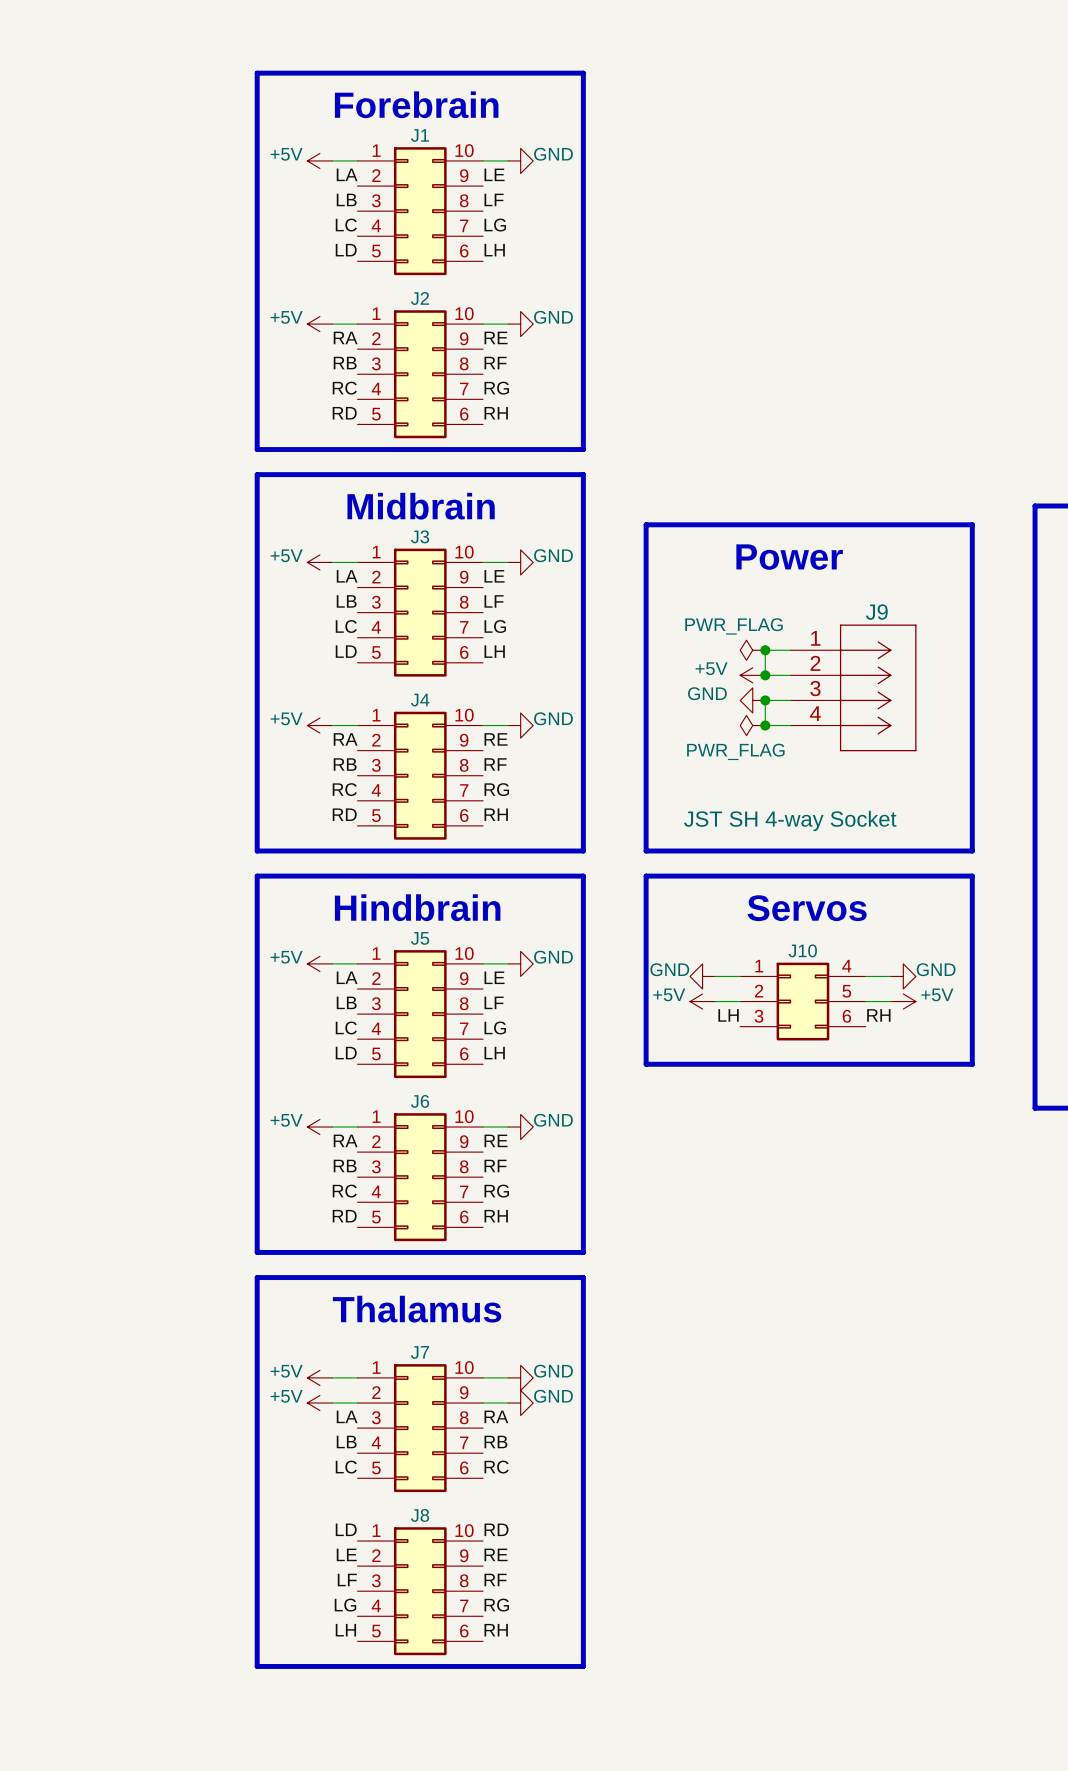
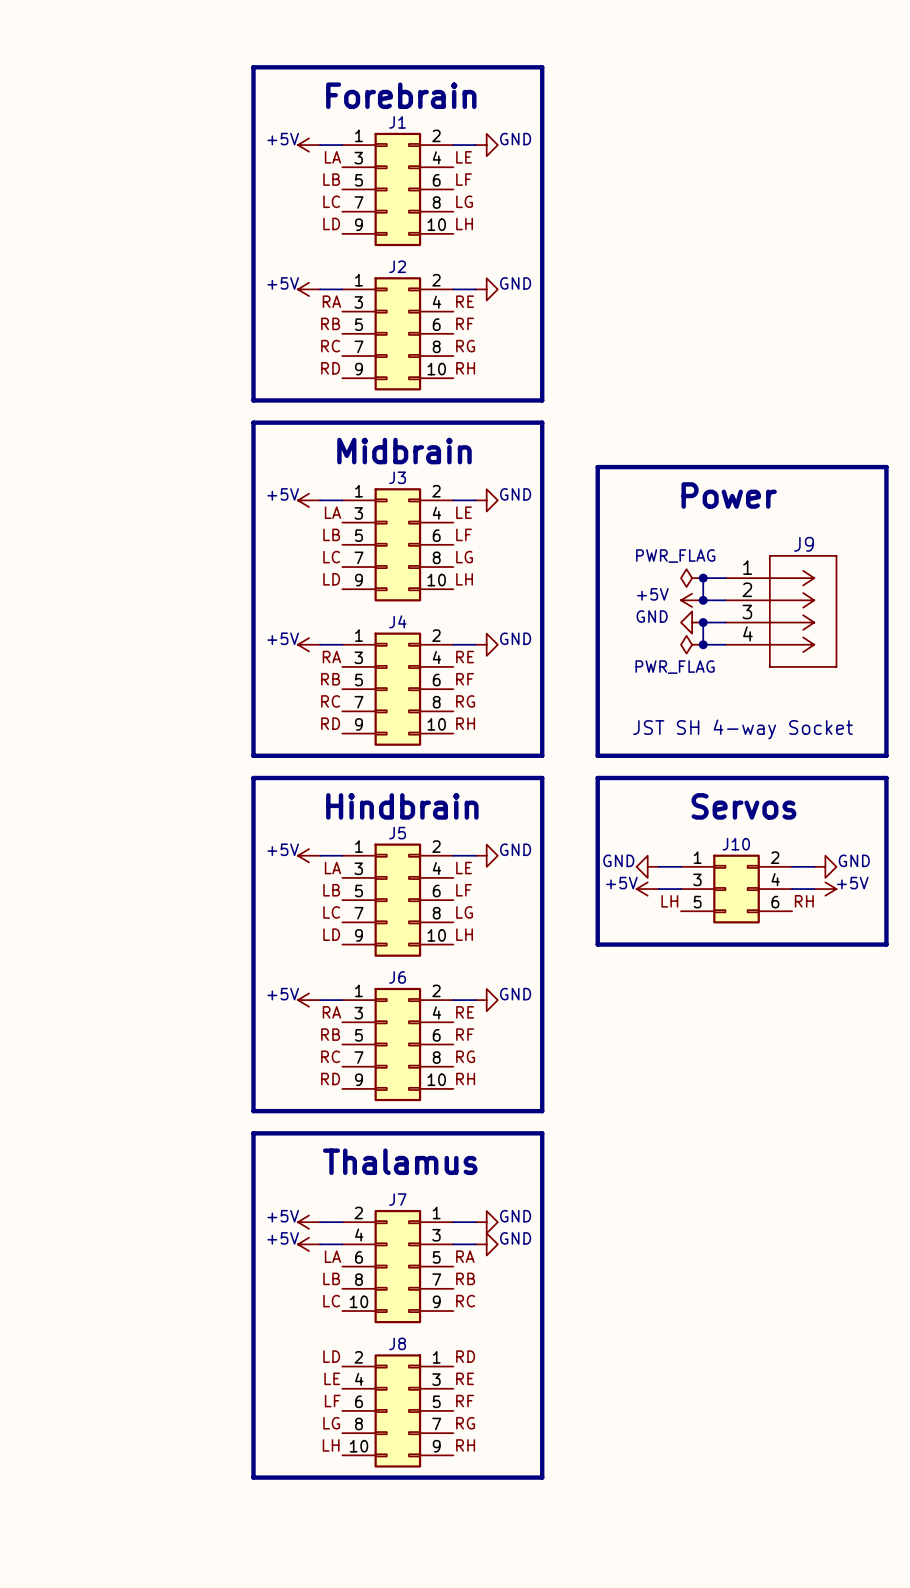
J1 symbol: [357, 147, 484, 276] -> [342, 132, 454, 247]
J2 symbol: [357, 310, 484, 439] -> [342, 277, 454, 391]
J3 symbol: [357, 548, 484, 677] -> [342, 488, 454, 602]
J4 symbol: [357, 711, 484, 840] -> [342, 632, 454, 746]
J5 symbol: [357, 950, 484, 1079] -> [342, 843, 454, 957]
J10 pin number: 4 (846, 966) -> 2 (775, 857)
J10 pin number: 2 (759, 991) -> 3 (697, 879)
J10 pin number: 5 (846, 991) -> 4 (775, 879)
J10 pin number: 3 (758, 1016) -> 5 (697, 902)
J6 symbol: [357, 1113, 484, 1242] -> [342, 987, 454, 1102]
J7 symbol: [357, 1364, 484, 1493] -> [342, 1209, 454, 1324]
J8 symbol: [357, 1527, 484, 1656] -> [342, 1354, 454, 1468]

